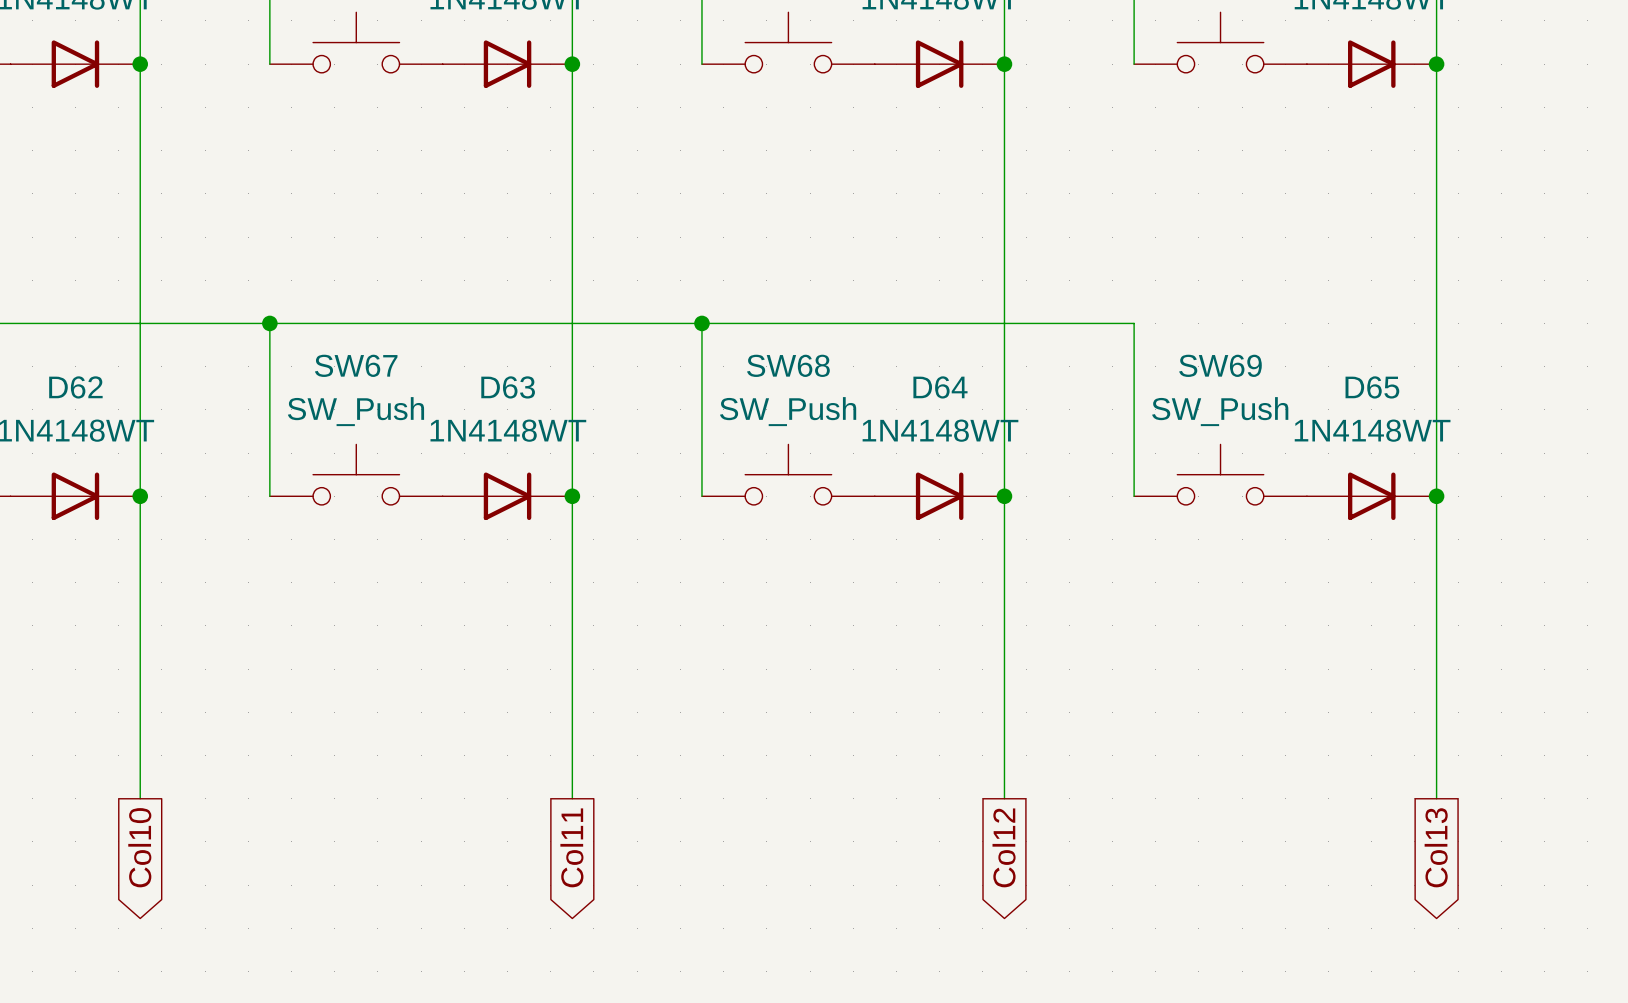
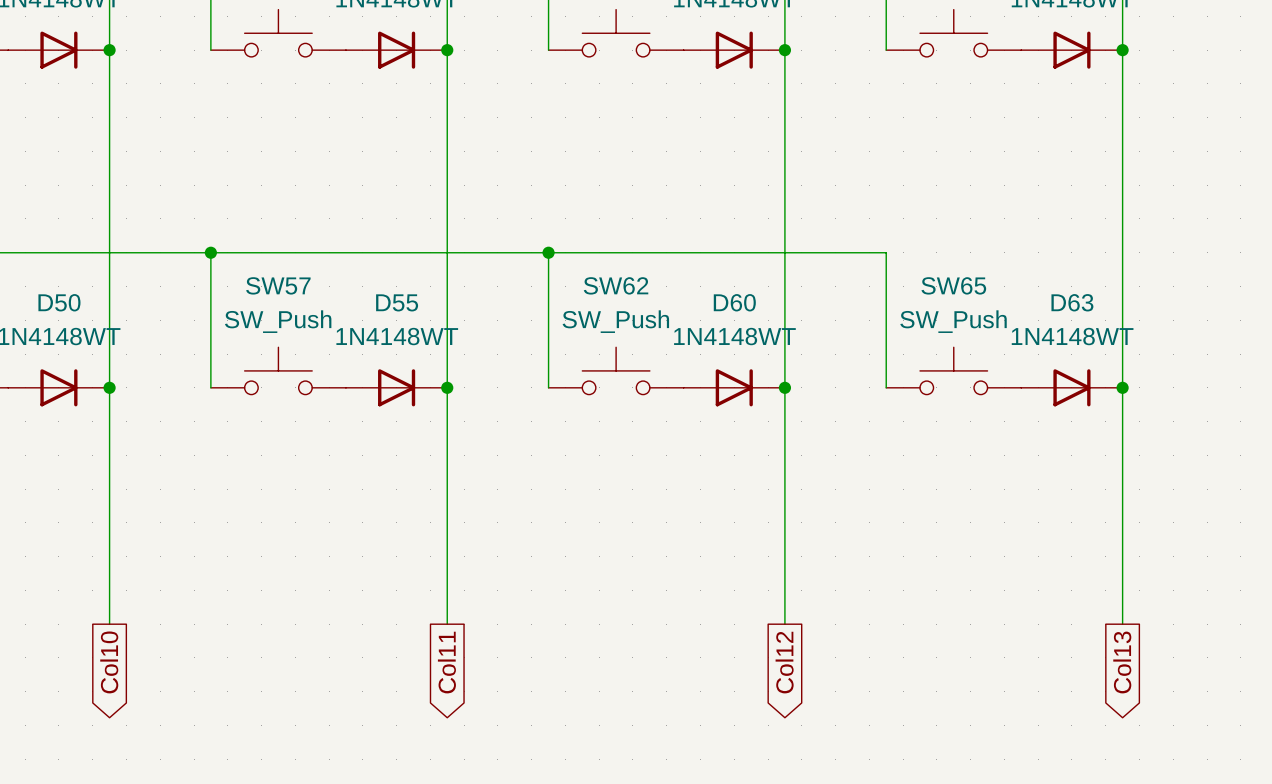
SW67 name: SW67 (356, 365) -> SW57 (278, 285)
SW68 name: SW68 (788, 365) -> SW62 (616, 285)
SW69 name: SW69 (1220, 365) -> SW65 (953, 285)
D62 name: D62 (75, 387) -> D50 (59, 302)
D63 name: D63 (508, 387) -> D55 (397, 302)
D64 name: D64 (940, 387) -> D60 (734, 302)
D65 name: D65 (1372, 387) -> D63 (1072, 302)

